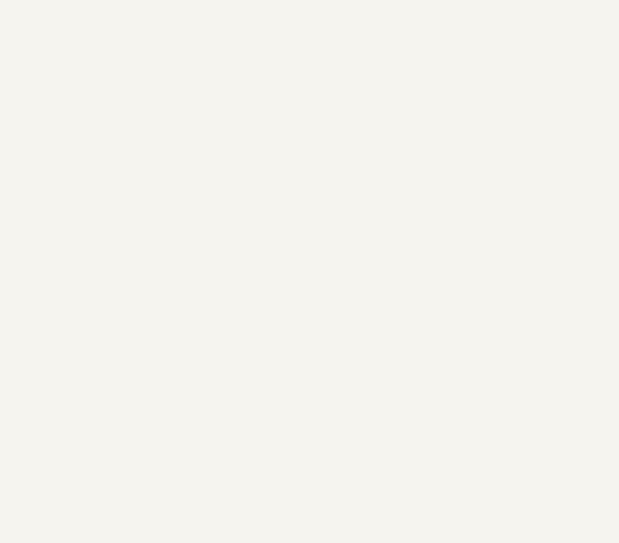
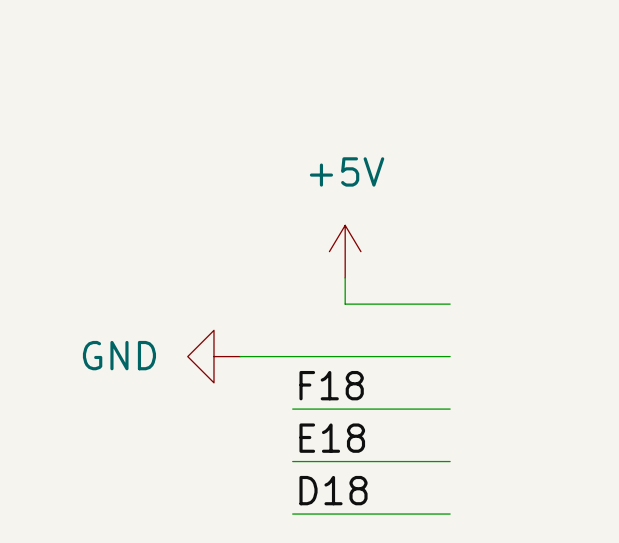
power symbol: none -> +5V (345, 251)
wire: none -> (345, 277) (345, 304) (450, 304)
power symbol: none -> GND (213, 356)
wire: none -> (240, 356) (450, 356)
label: none -> F18 (331, 385)
wire: none -> (292, 409) (450, 409)
label: none -> E18 (332, 438)
wire: none -> (292, 461) (450, 461)
label: none -> D18 (333, 490)
wire: none -> (292, 514) (450, 514)

